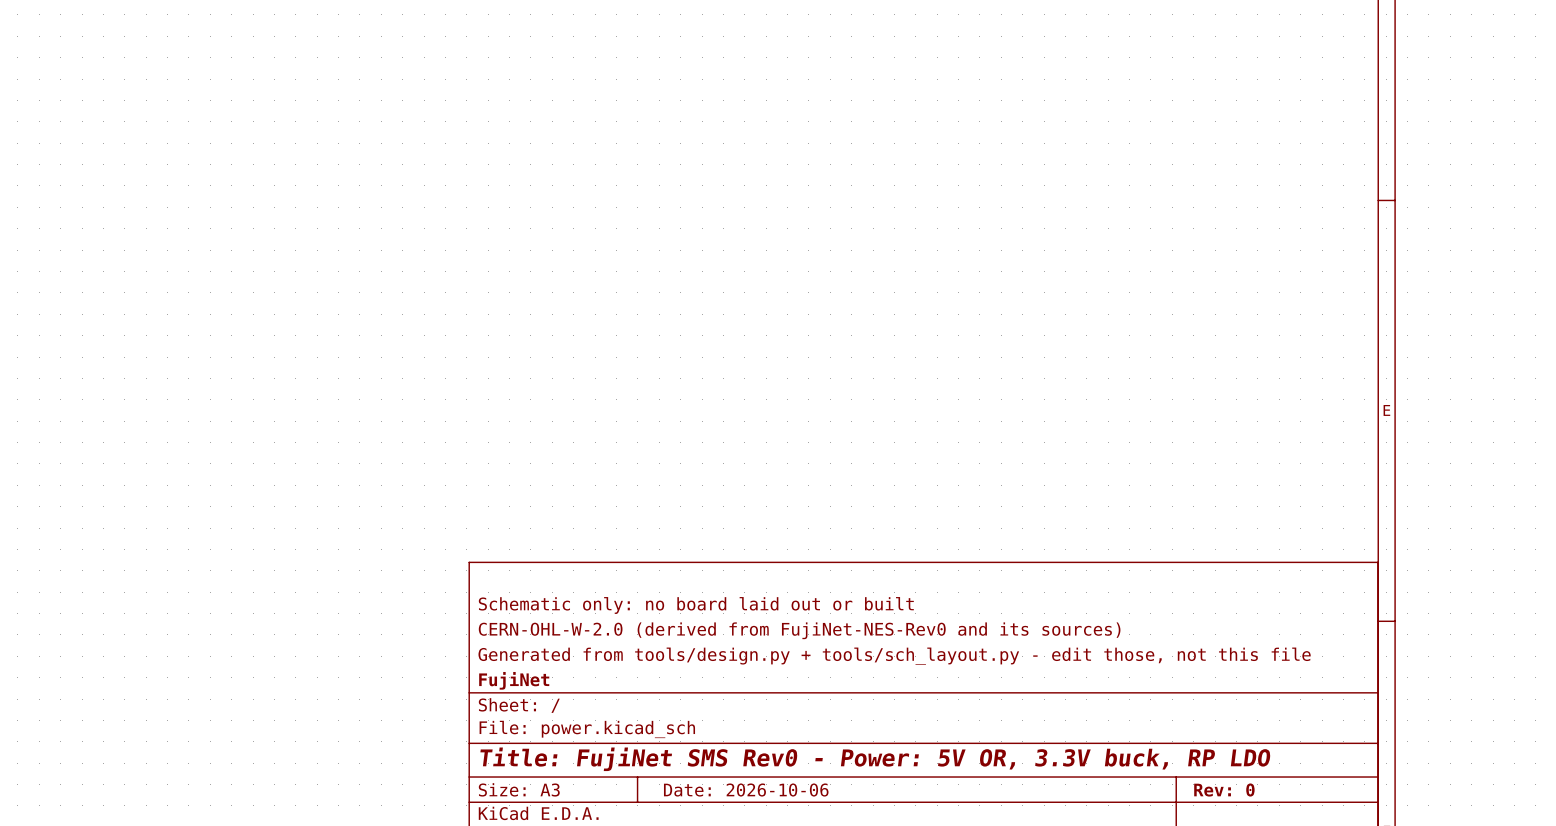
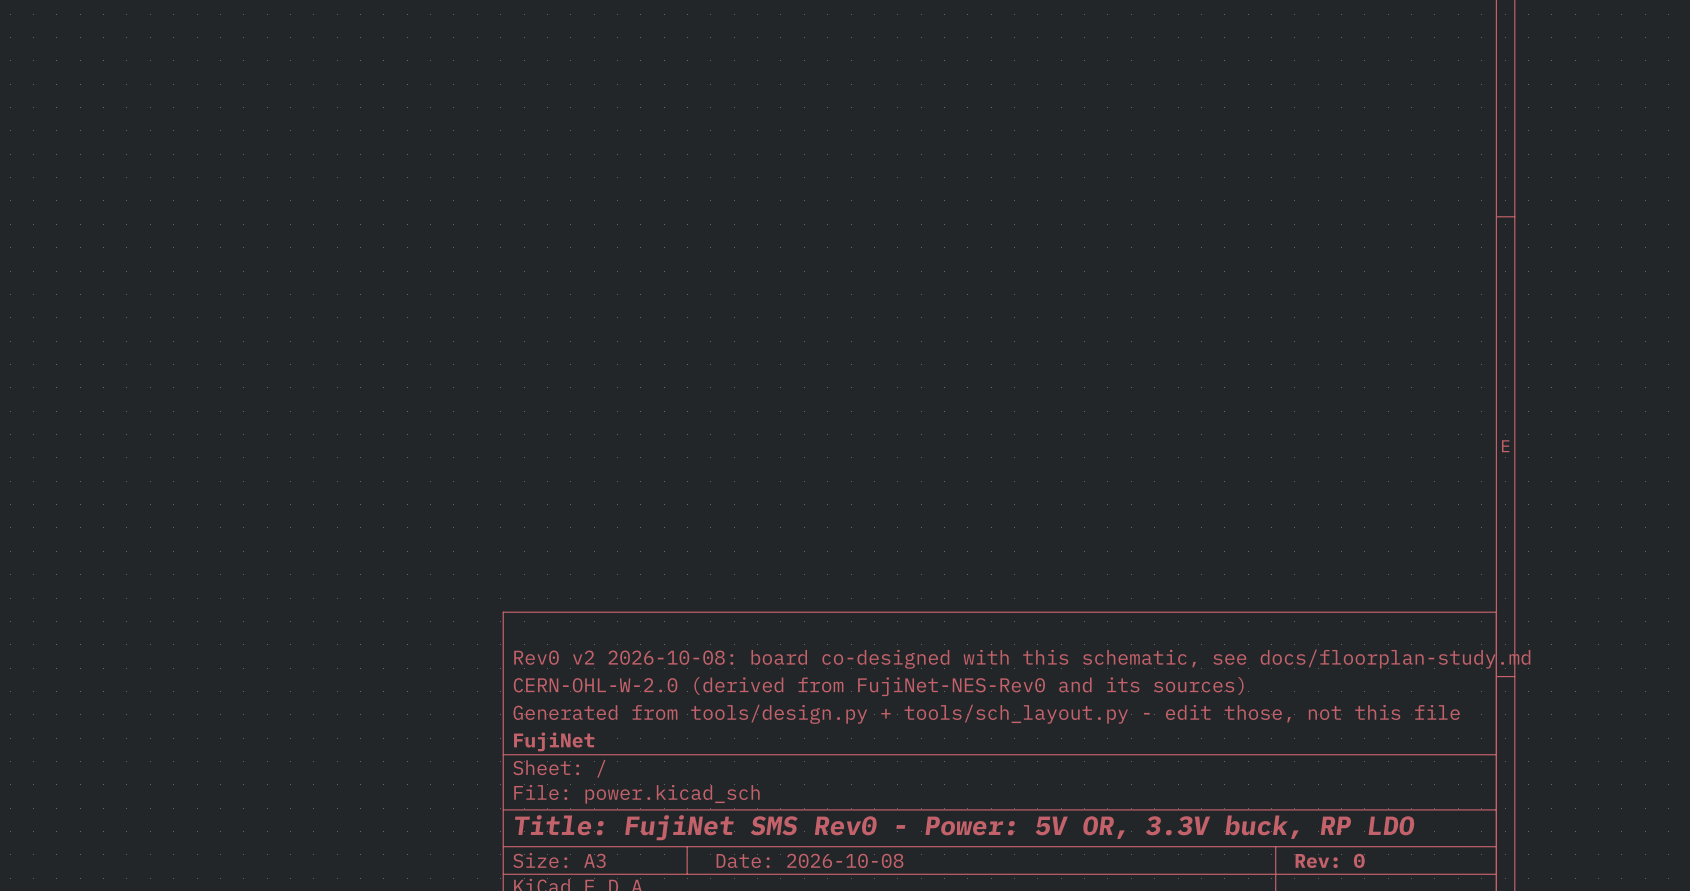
title block: Schematic only: no board laid out or built (696, 605) -> Rev0 v2 2026-10-08: board co-designed with this schematic, see docs/floorplan-study.md (1022, 659)
title block: Date: 2026-10-06 (746, 790) -> Date: 2026-10-08 (810, 860)

